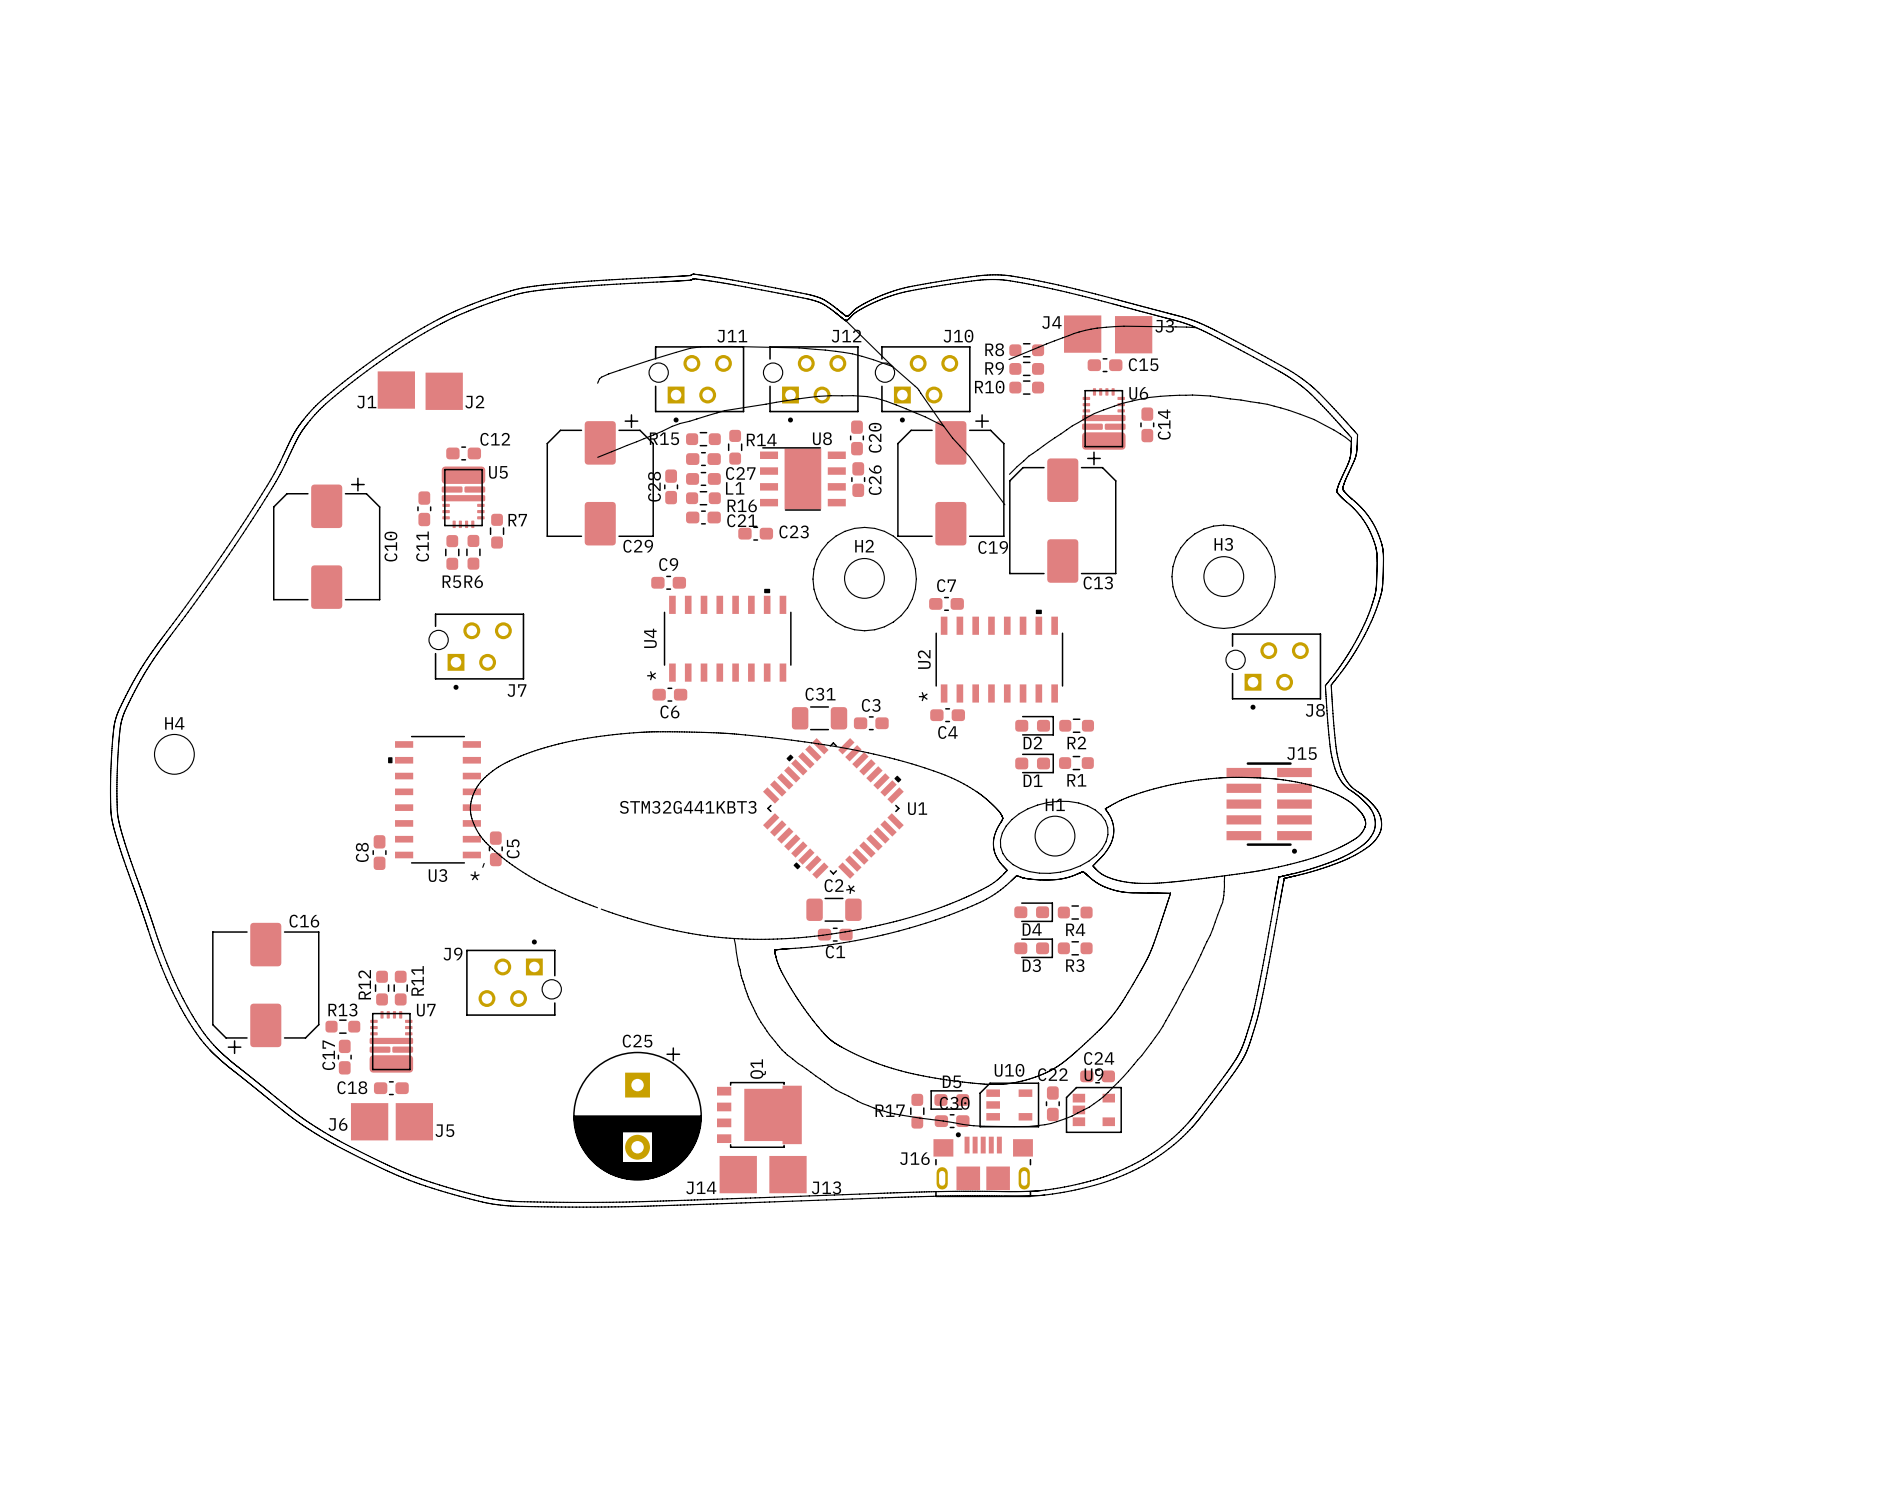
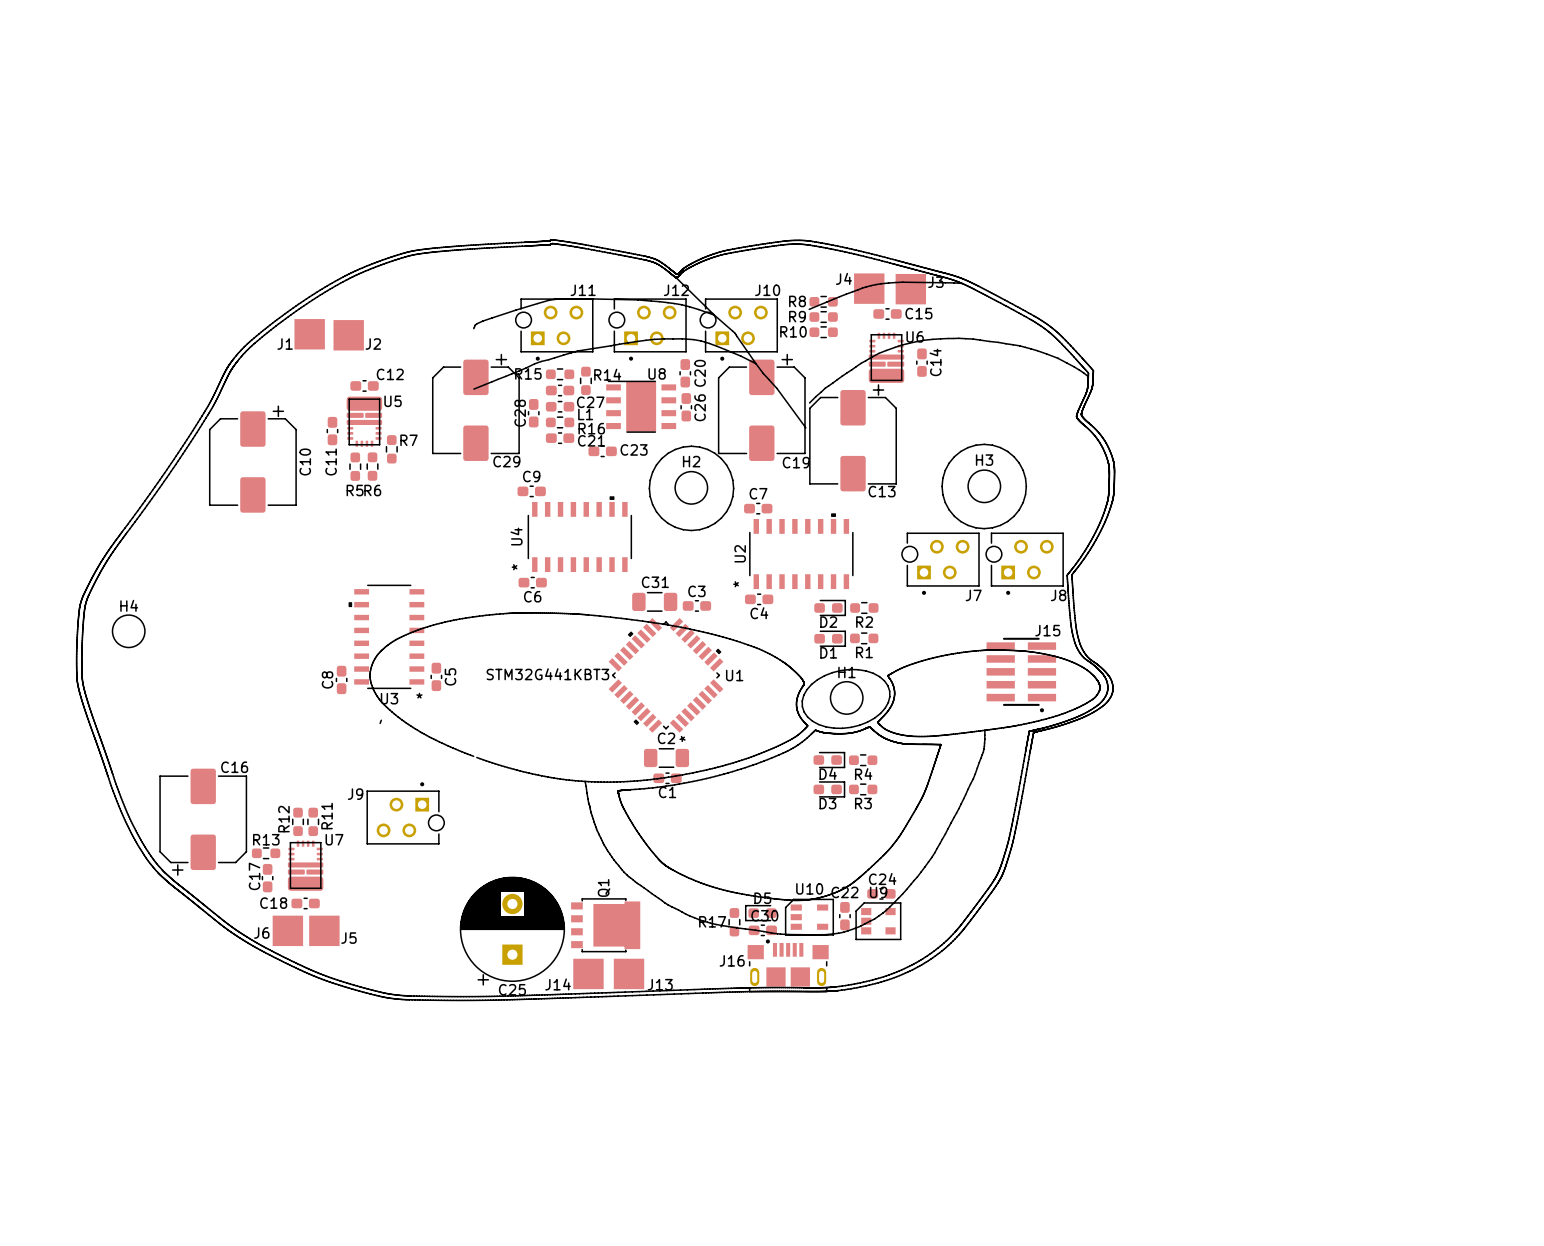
J7 position: (476, 651) -> (940, 563)
U3 position: (434, 799) -> (386, 636)
C5 position: (495, 848) -> (436, 676)
C8 position: (379, 852) -> (341, 679)
C25 rotation: 0° (637, 1113) -> 180° (512, 931)

